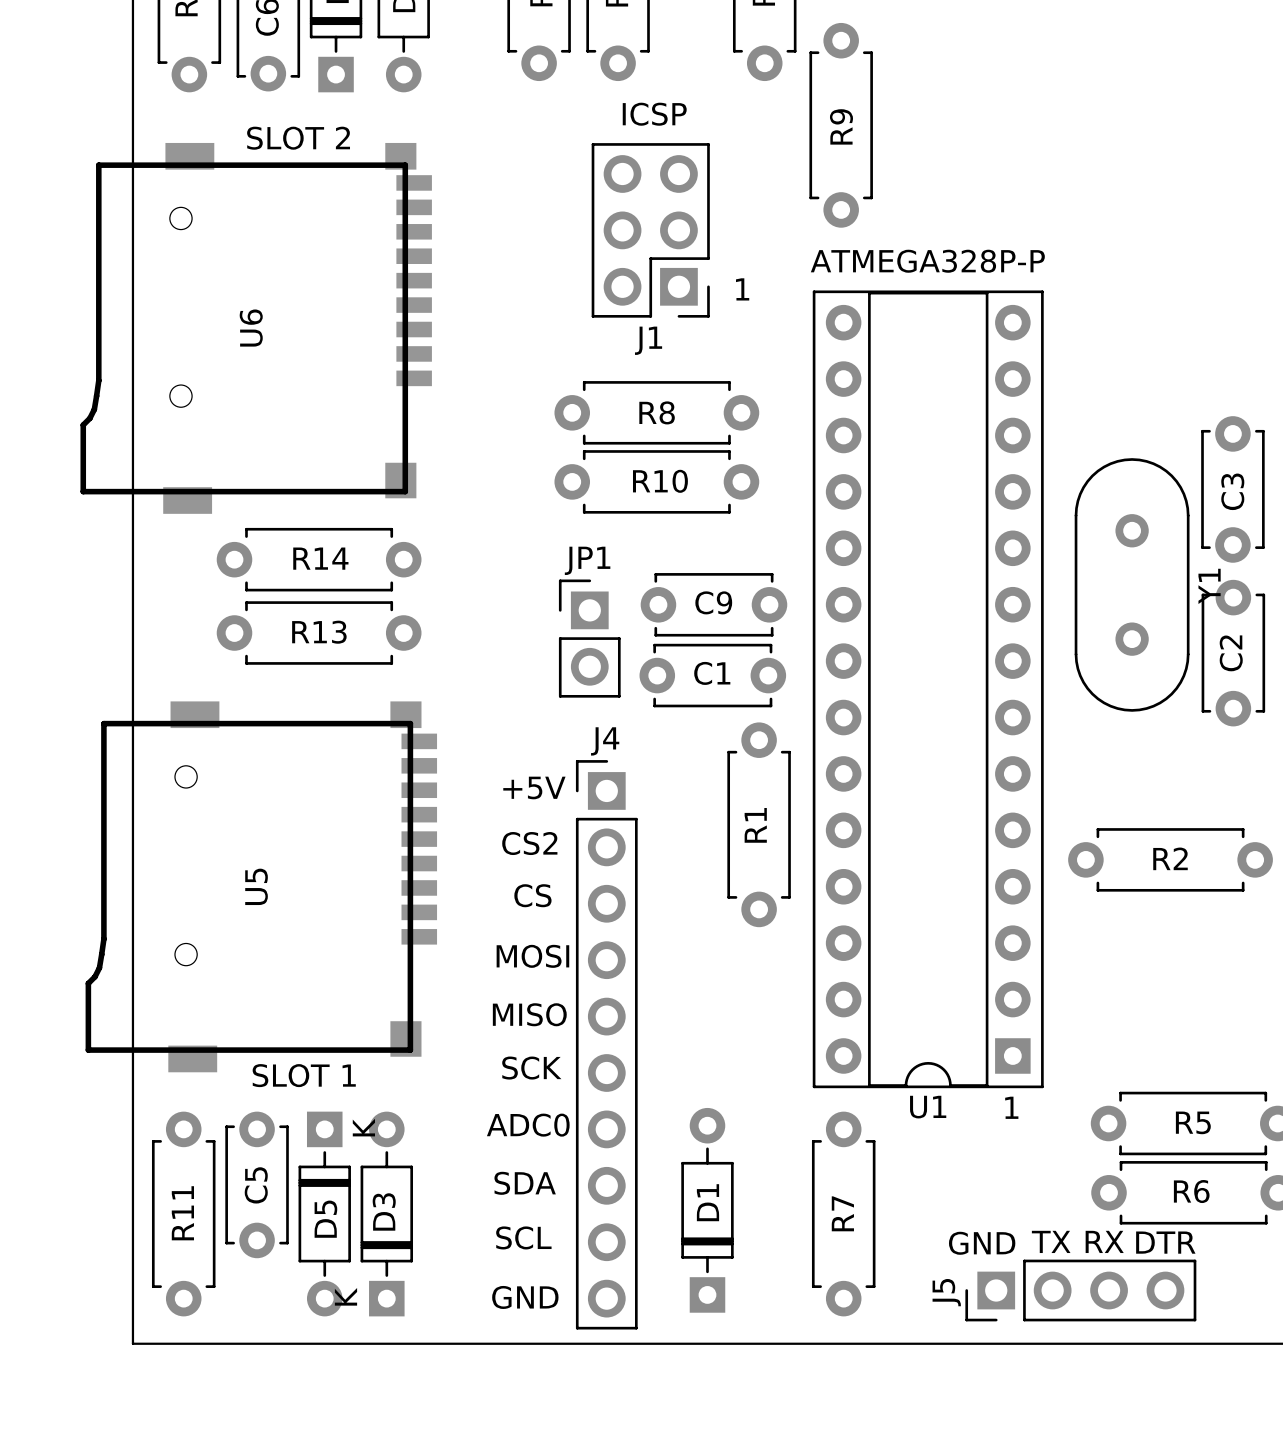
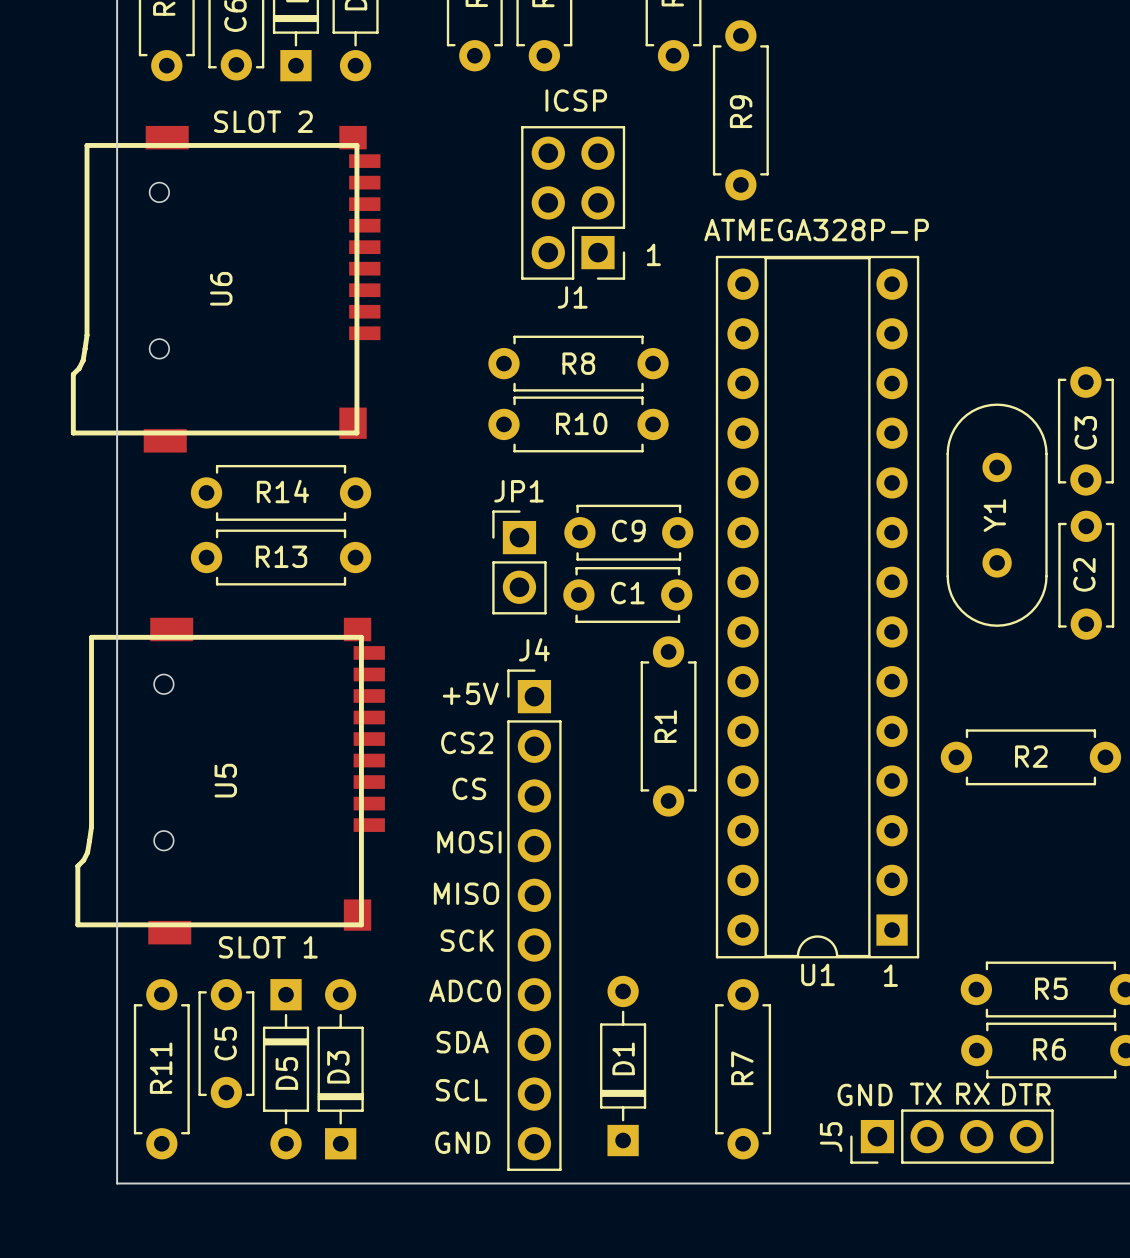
Y1 name position: Y1 (1209, 586) -> Y1 (994, 515)
D5 text: K (363, 1127) -> none
D3 text: K (345, 1296) -> none

